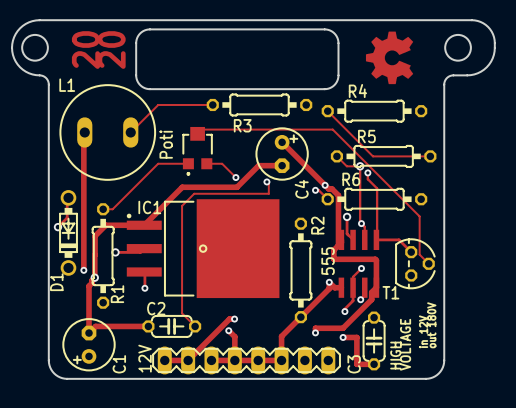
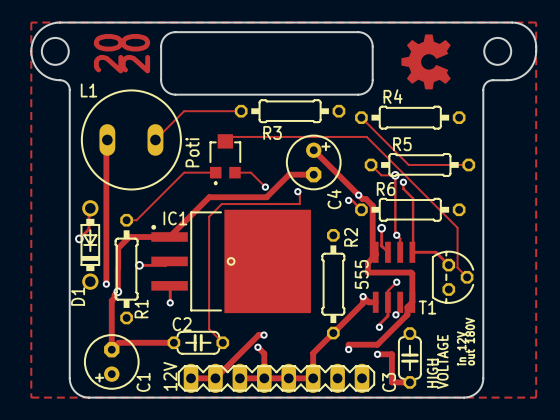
zone outline: none -> (31, 22) (31, 397) (536, 397) (536, 22) (31, 22)

